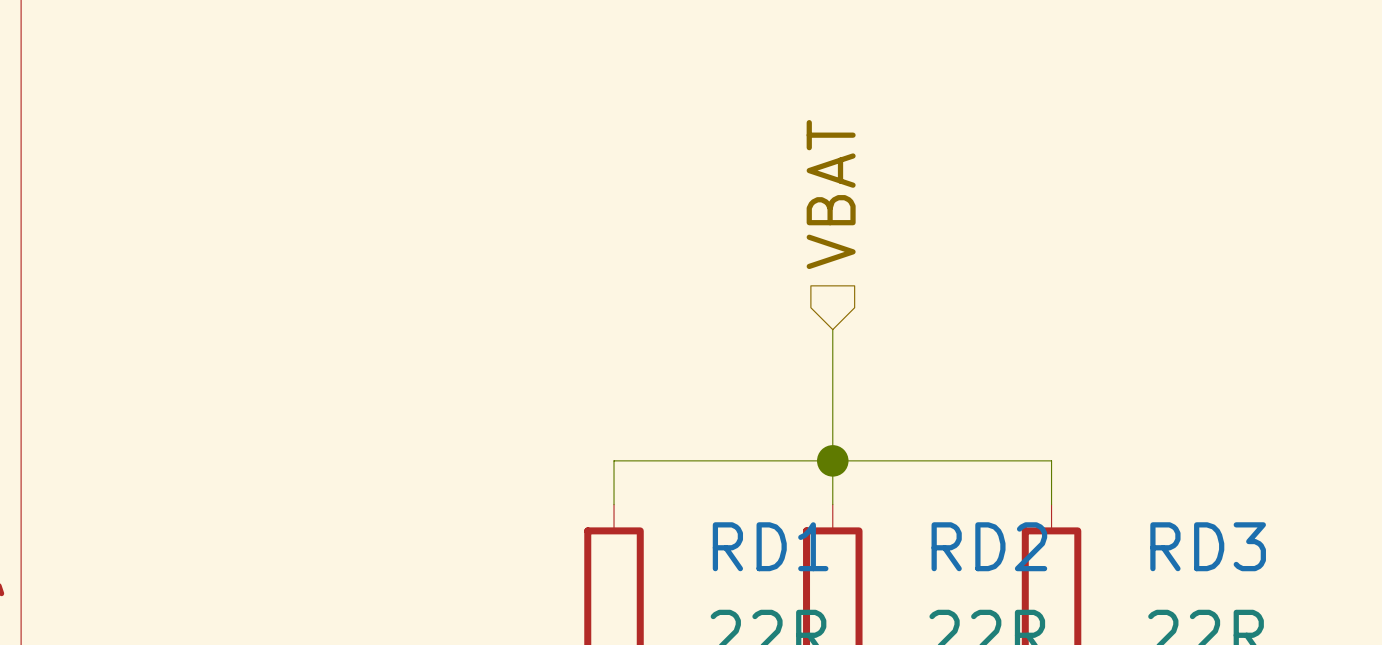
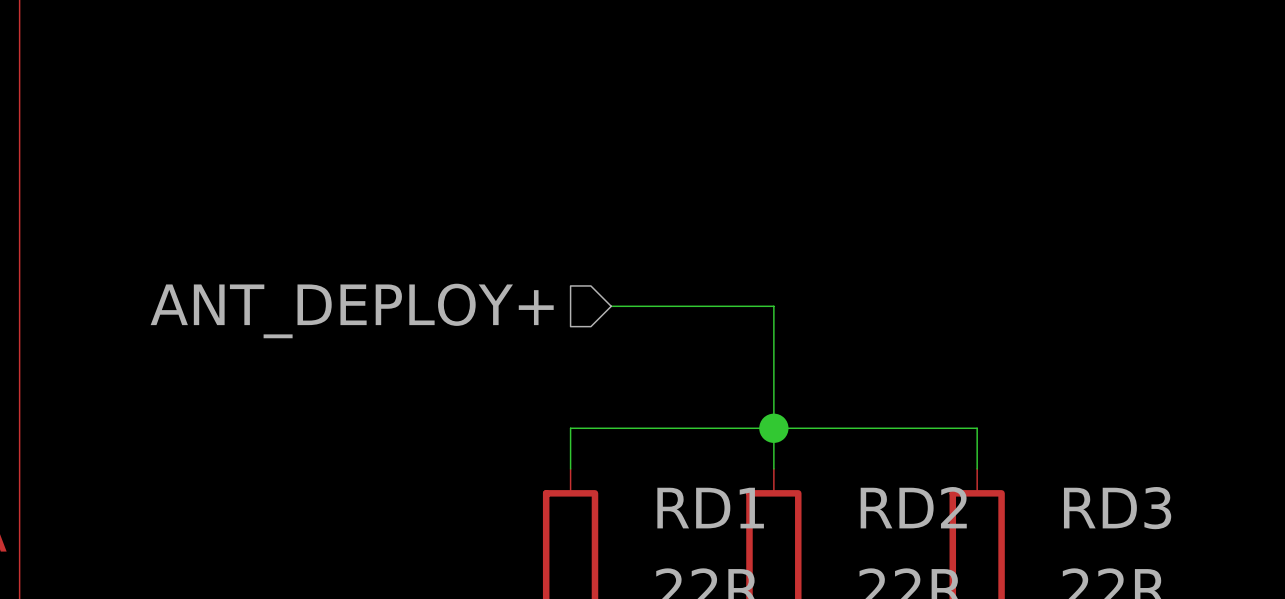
hierarchical label: VBAT (831, 194) -> none
wire: none -> (611, 306) (773, 306)
hierarchical label: none -> ANT_DEPLOY+ (352, 310)

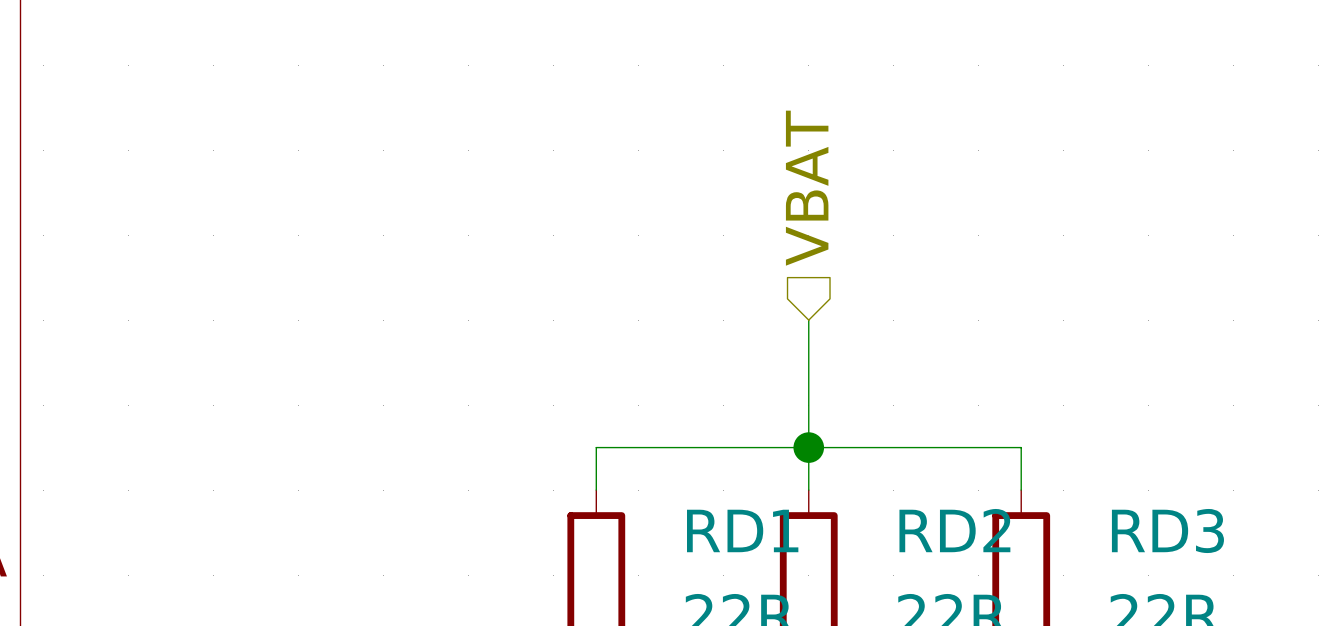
hierarchical label: none -> VBAT (807, 188)
wire: (611, 306) (773, 306) -> none
hierarchical label: ANT_DEPLOY+ (352, 310) -> none

